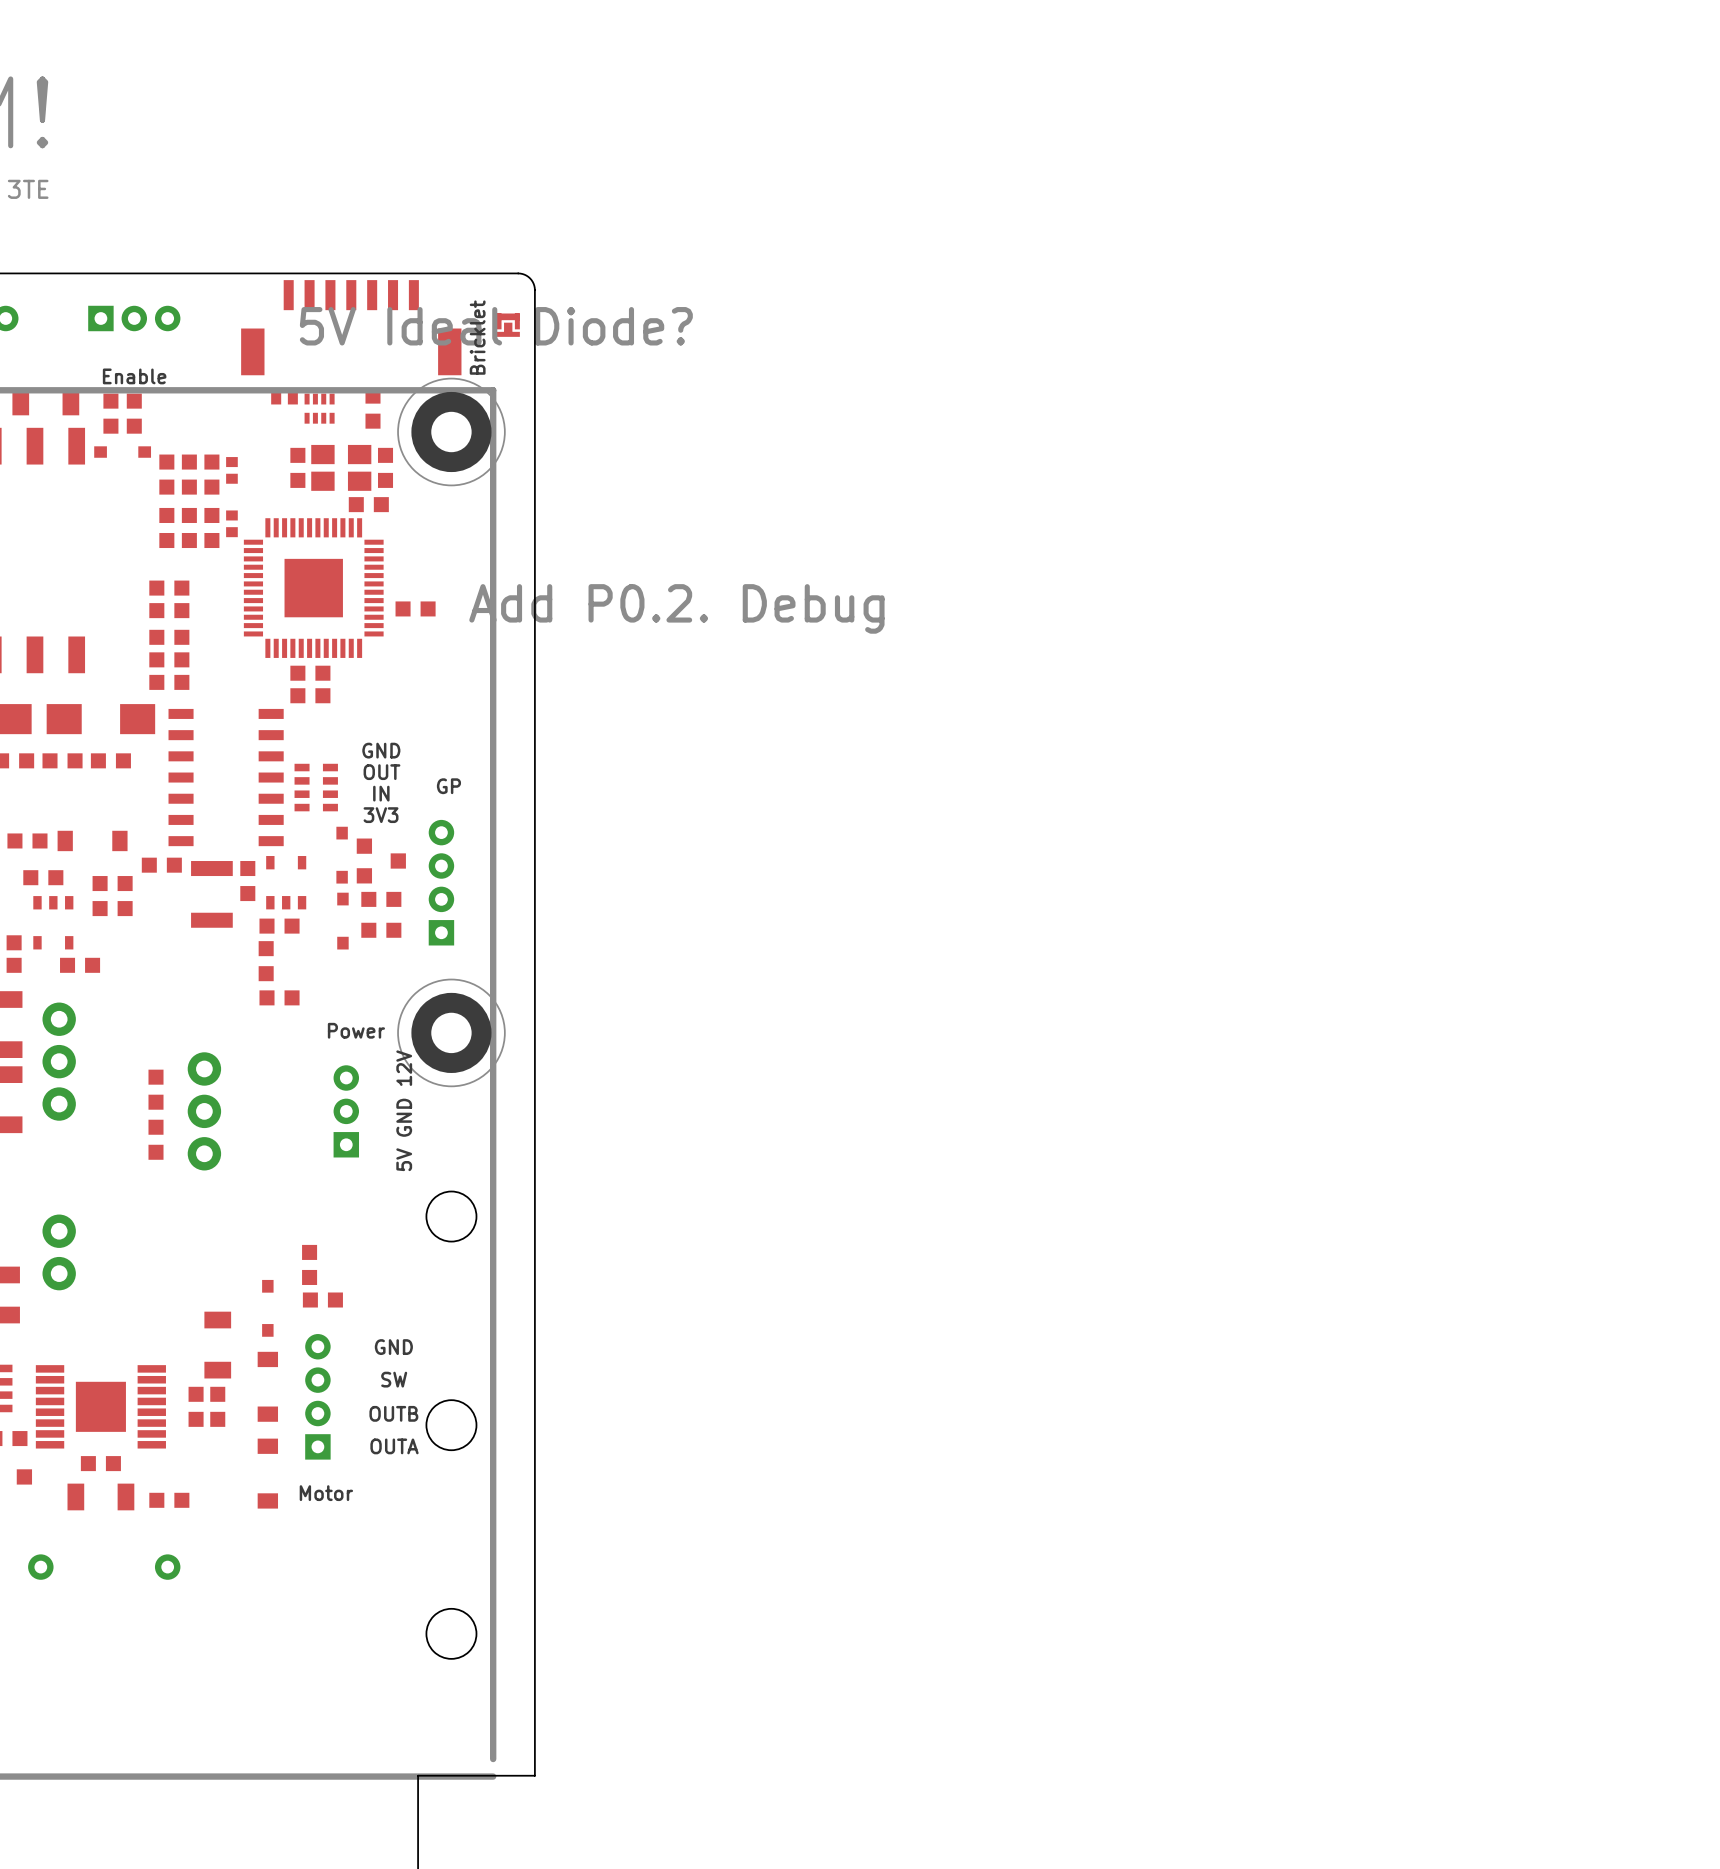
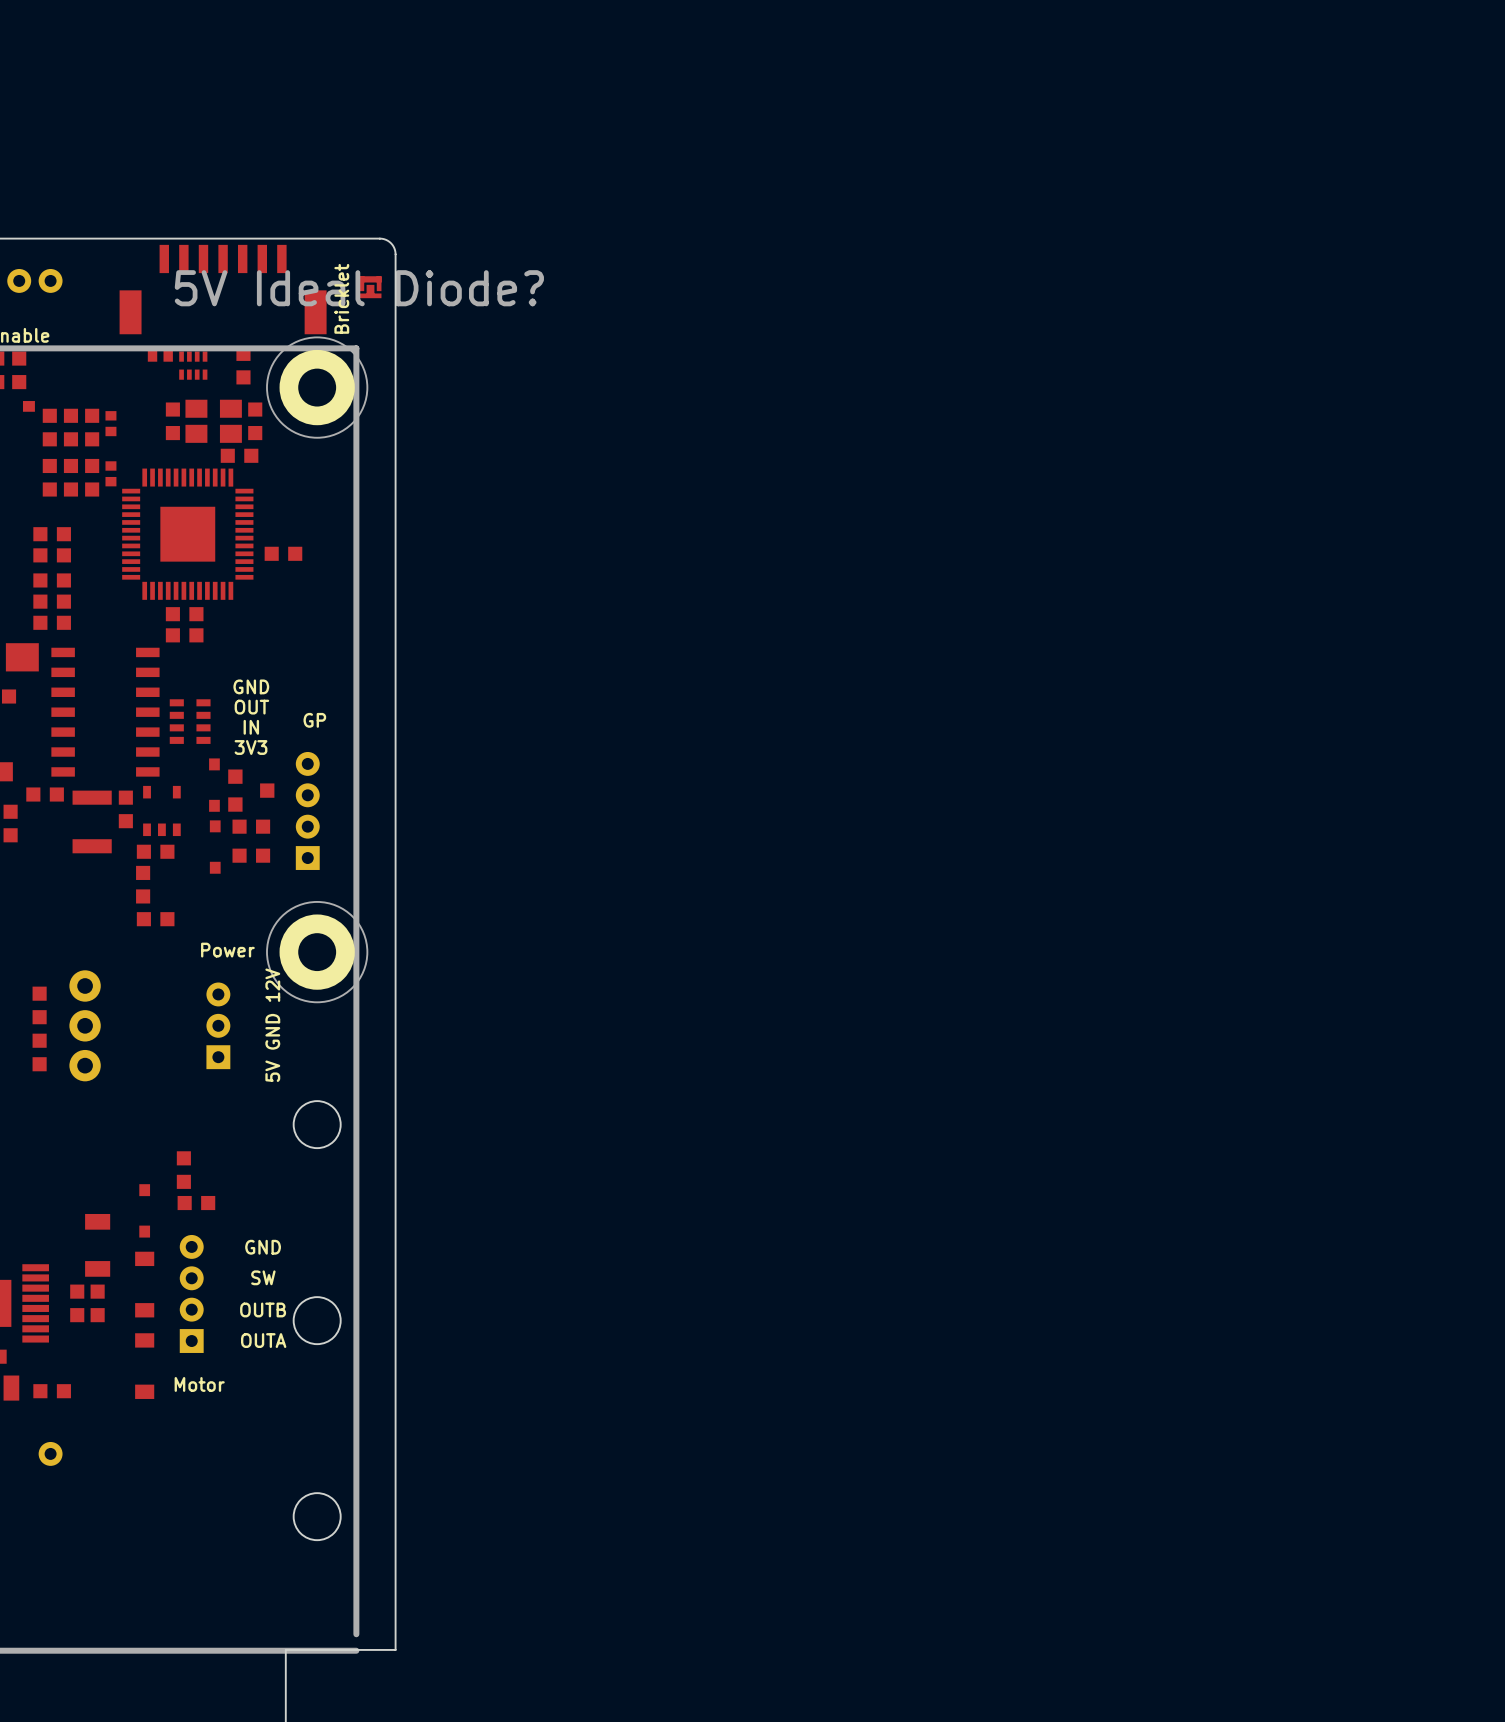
text: Add P0.2. Debug (676, 608) -> none

